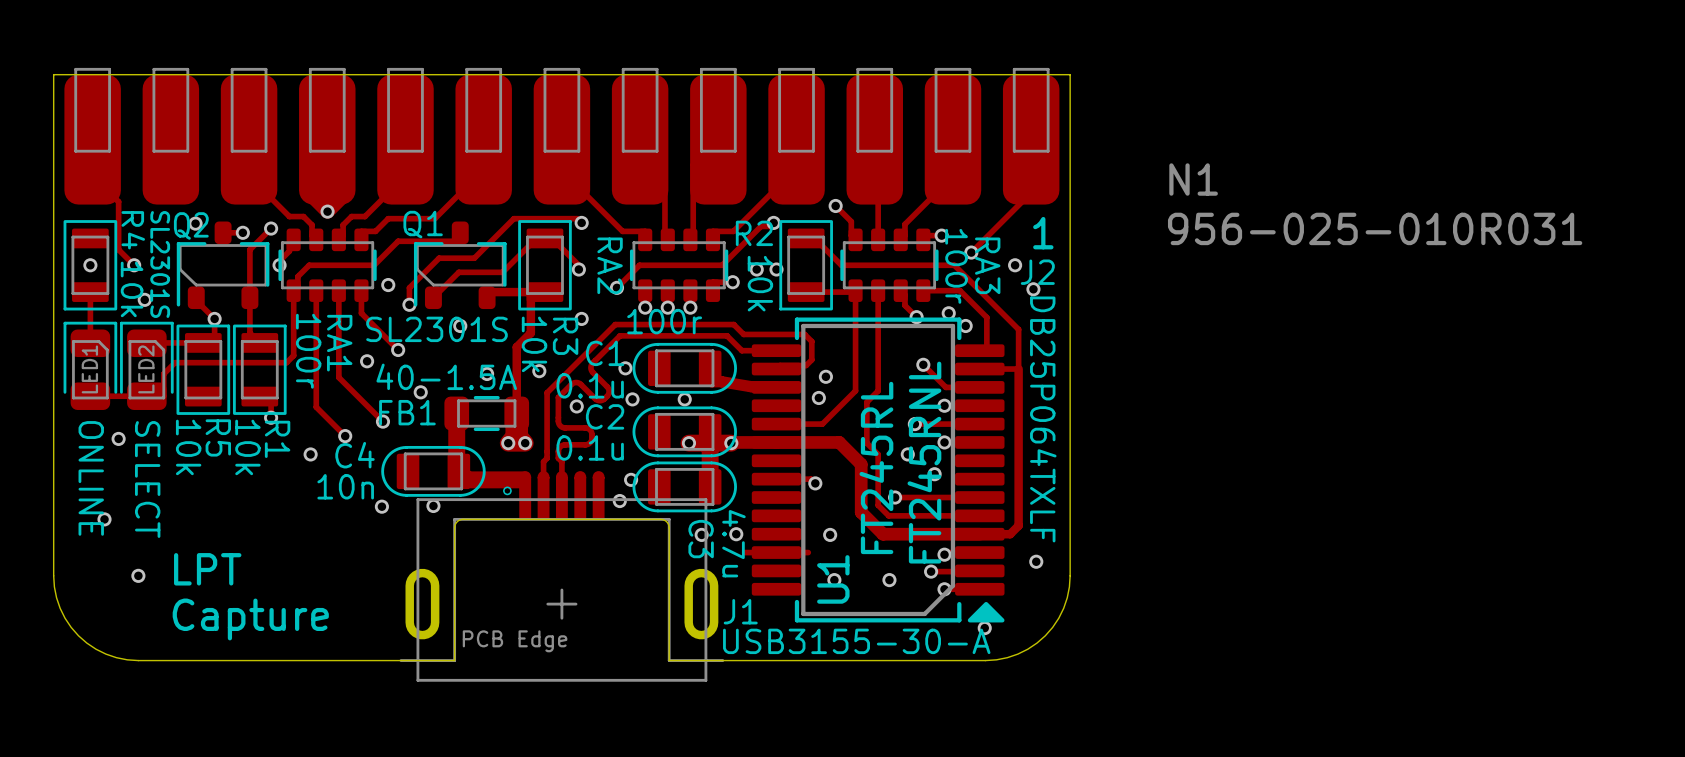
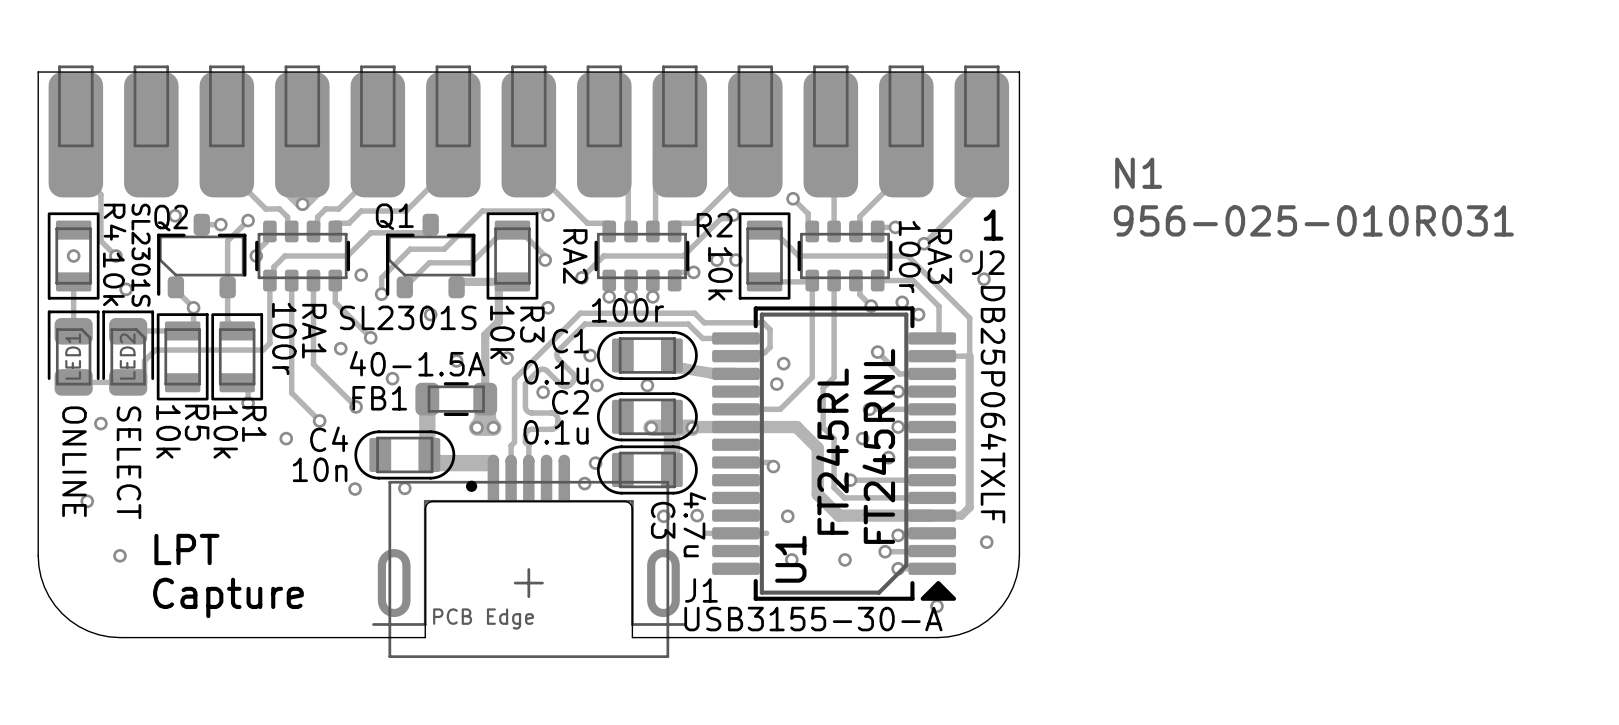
J1 footprint: [399, 471, 725, 682] -> [372, 454, 686, 659]

